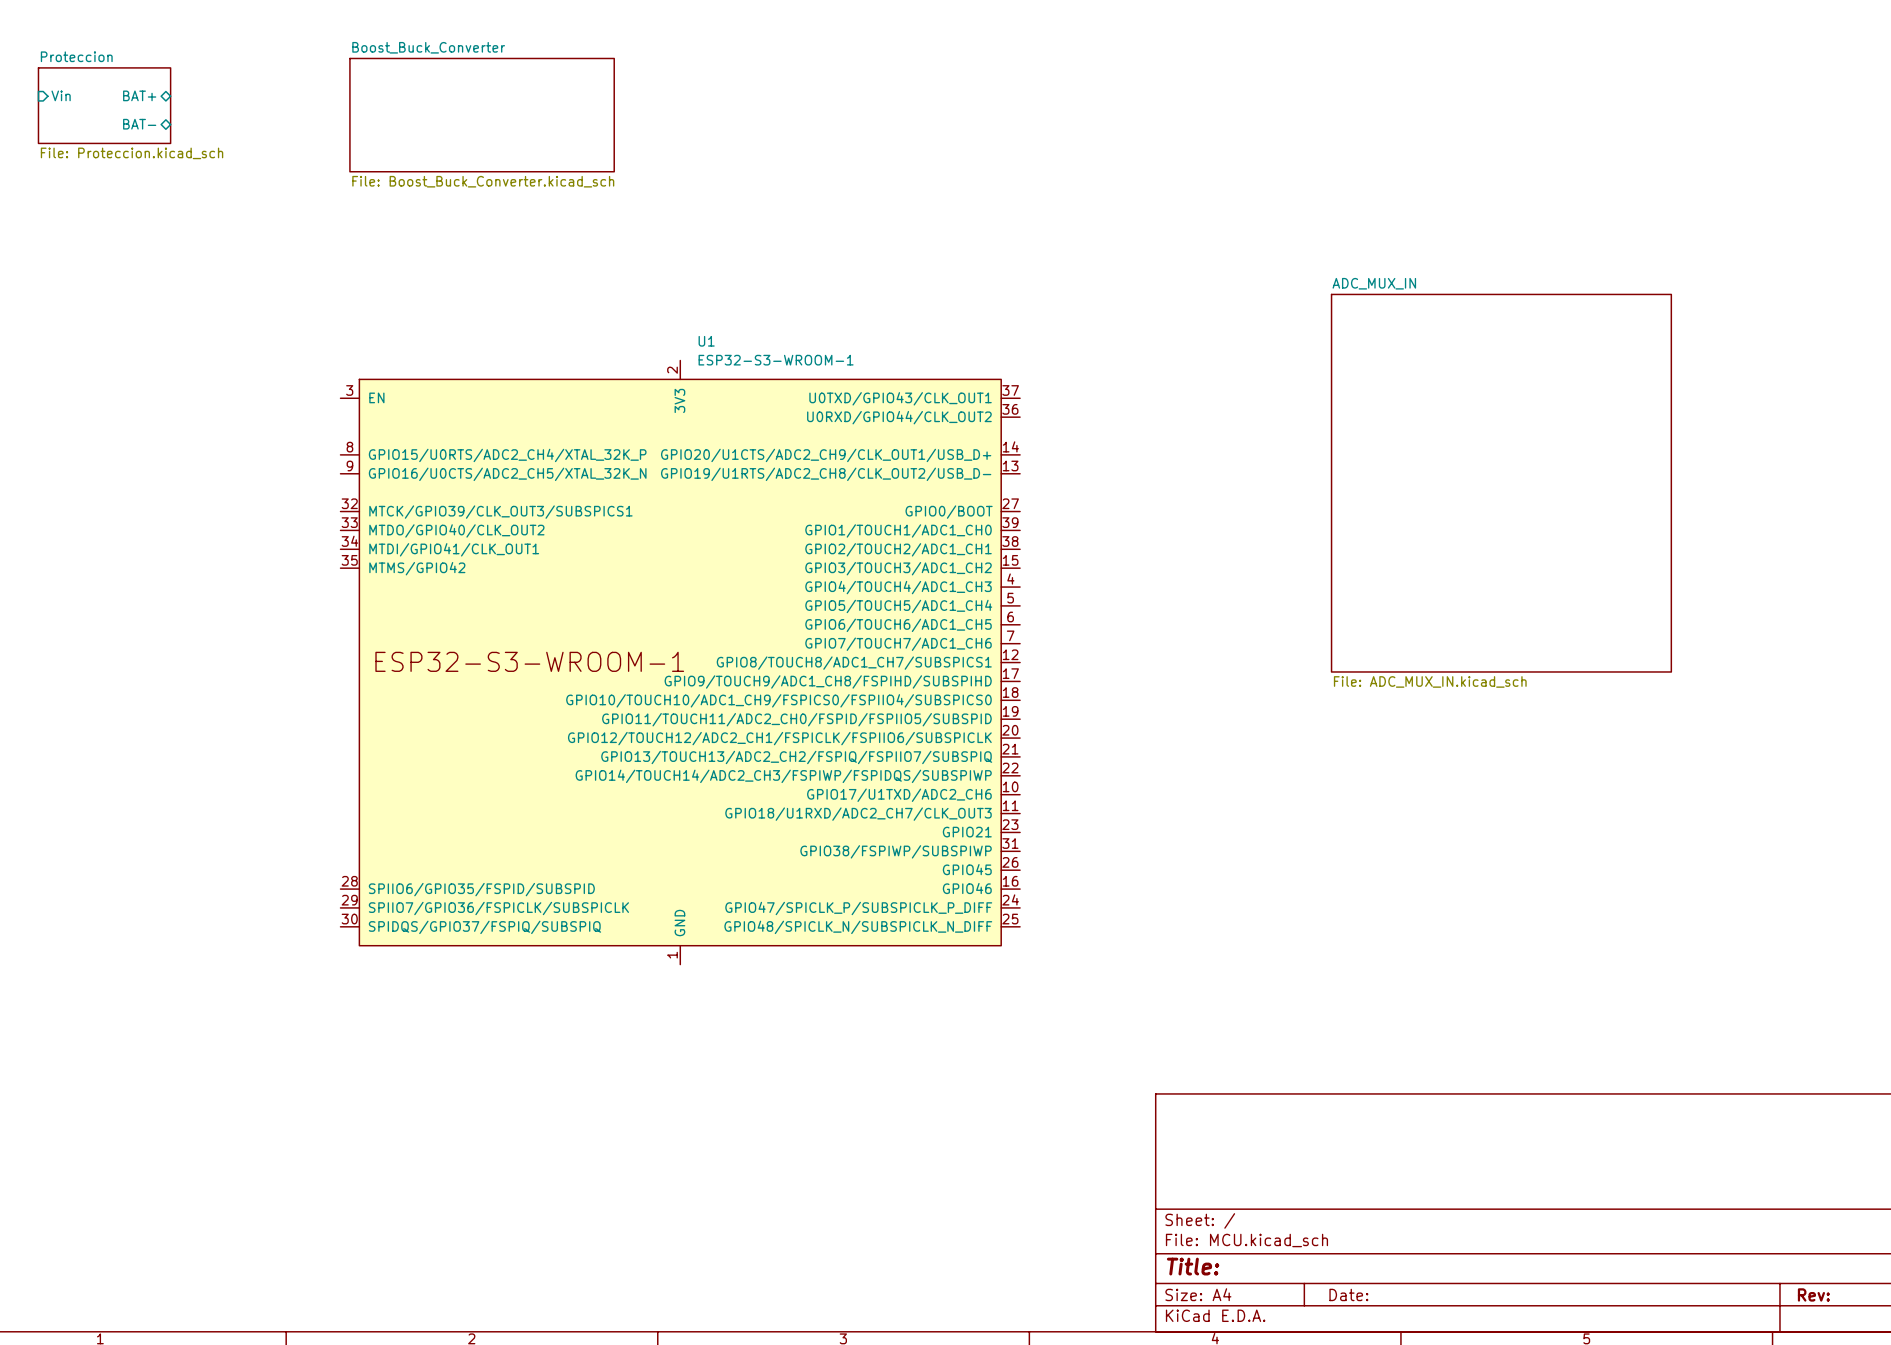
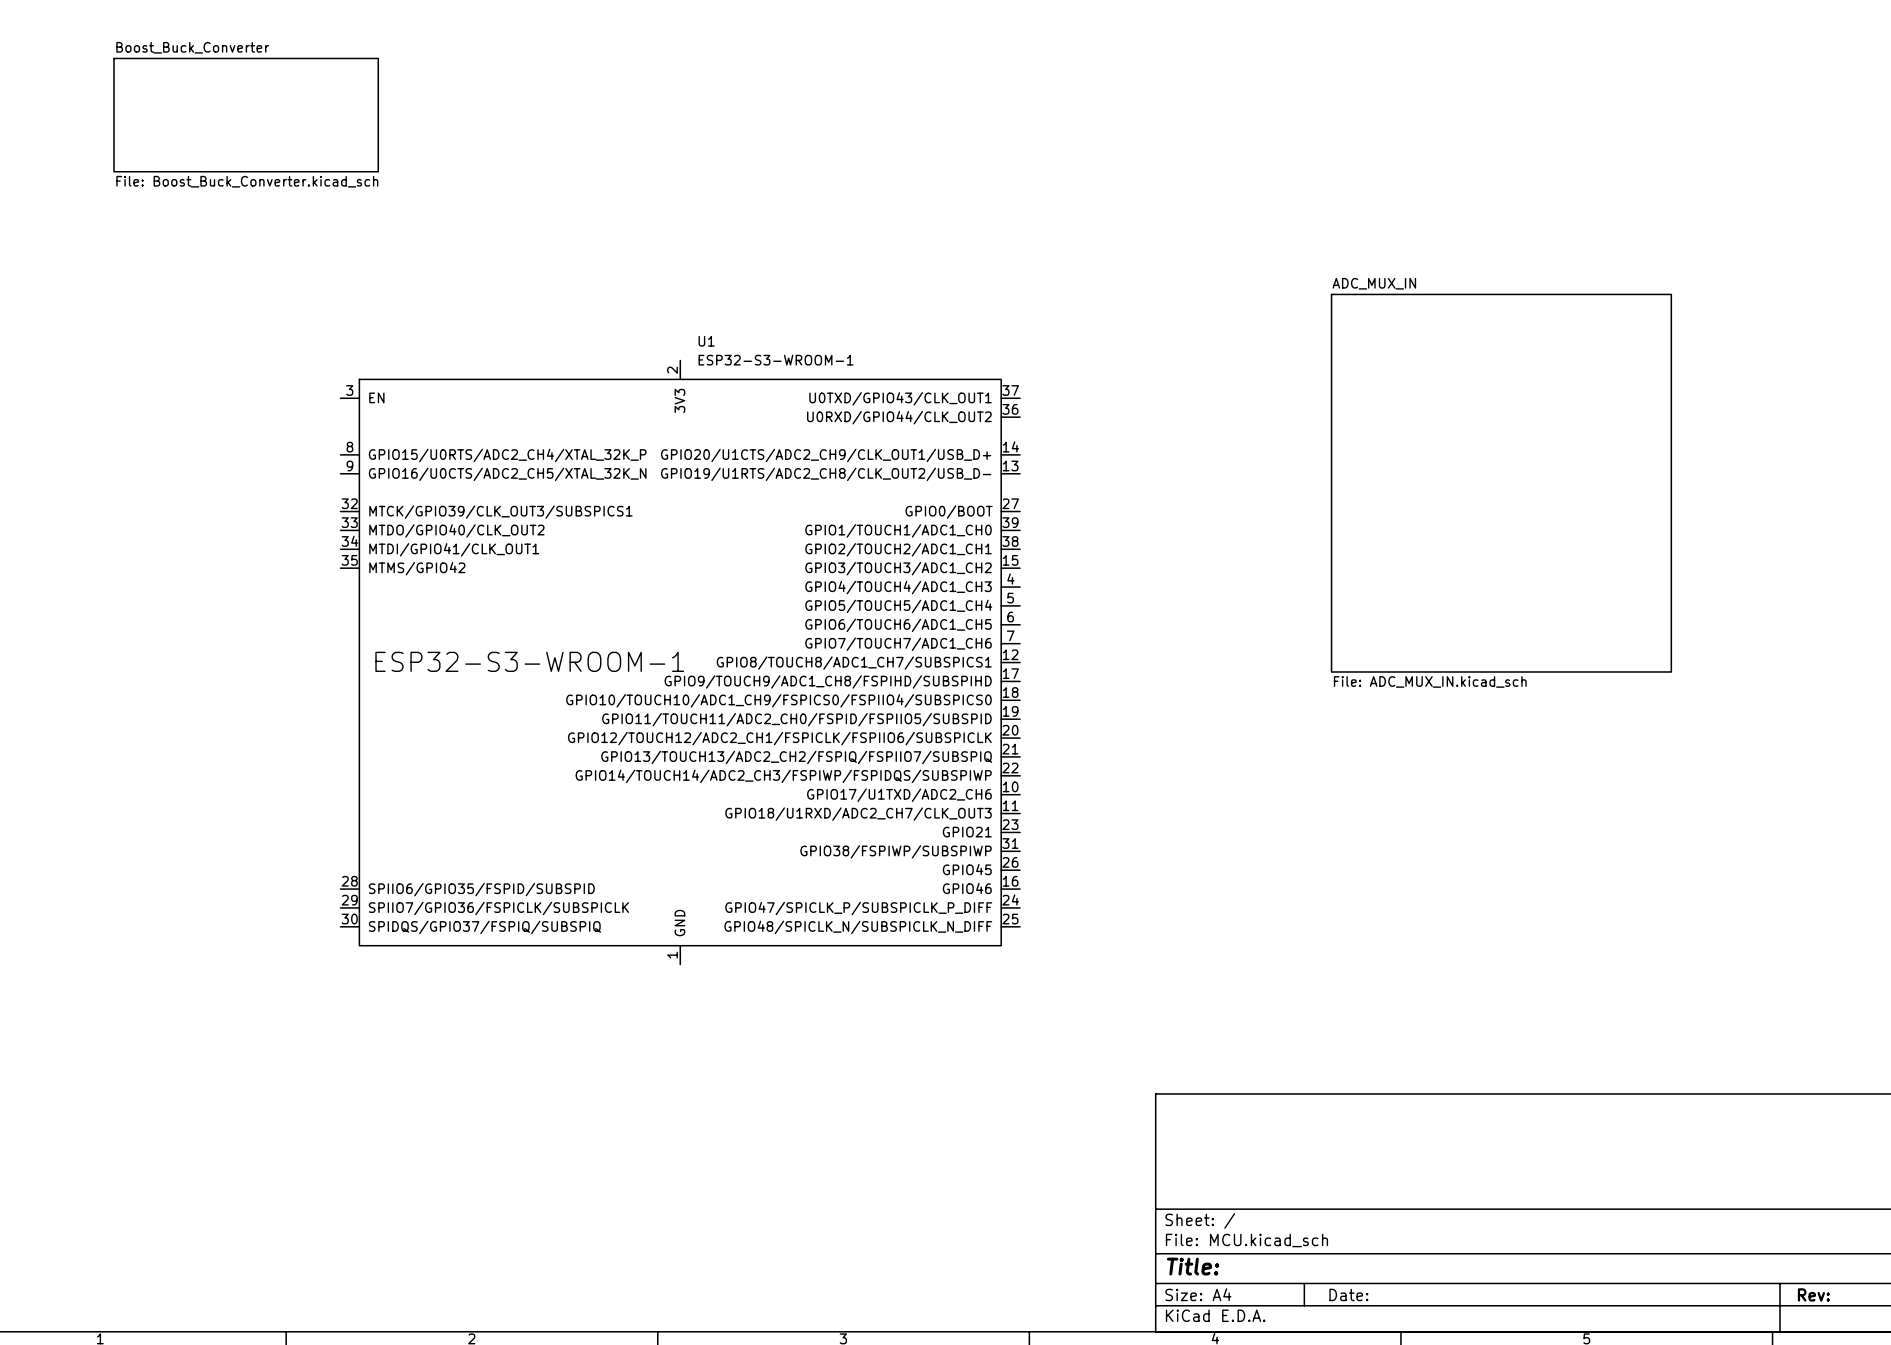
sheet pin: Vin (61, 95) -> none
sheet pin: BAT+ (139, 95) -> none
sheet Proteccion: File: Proteccion.kicad_sch (104, 105) -> none
sheet Boost_Buck_Converter: none -> File: Boost_Buck_Converter.kicad_sch (246, 115)
sheet Boost_Buck_Converter: File: Boost_Buck_Converter.kicad_sch (482, 115) -> none
sheet pin: BAT- (139, 124) -> none

